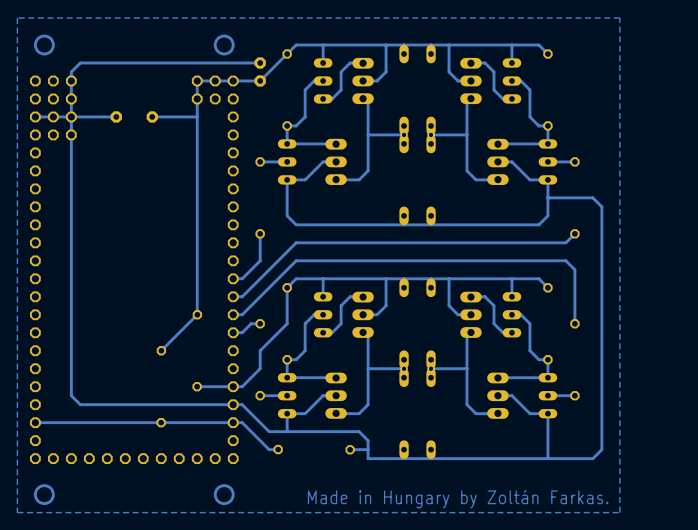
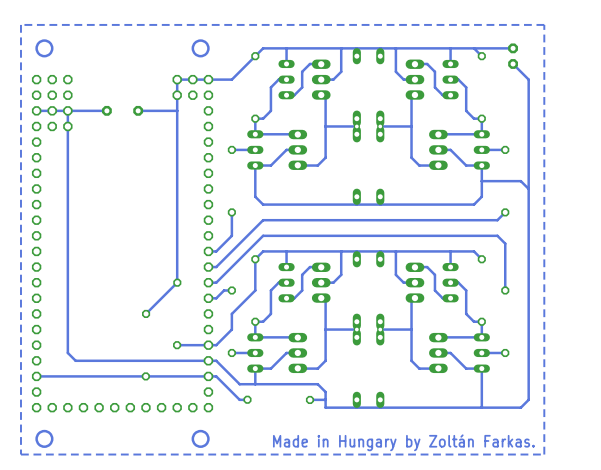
track: none -> (513, 48) (474, 48)
part: none -> (513, 56)
track: (260, 62) (80, 62) (71, 71) (71, 116) -> none
track: none -> (513, 63) (528, 79) (528, 188)
part: (260, 71) -> none

